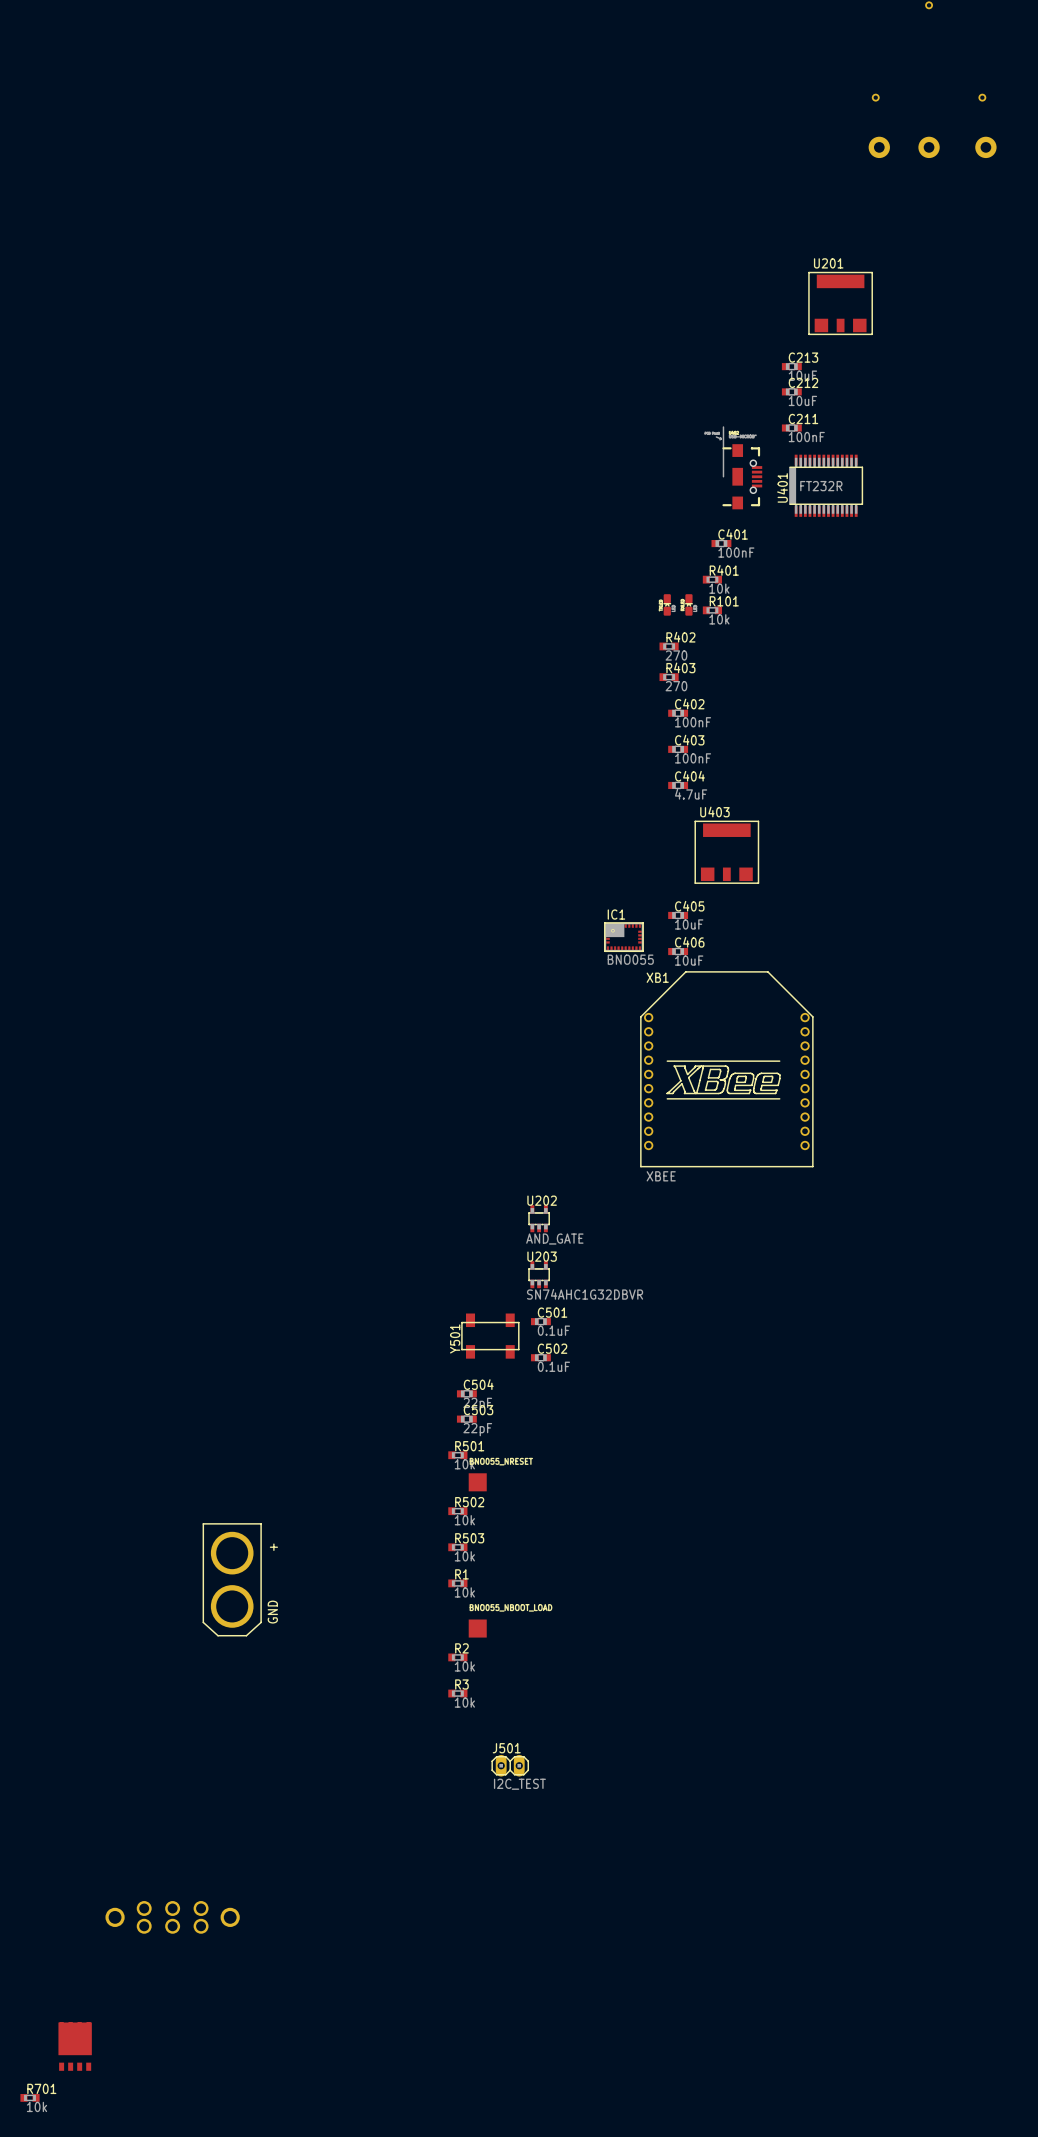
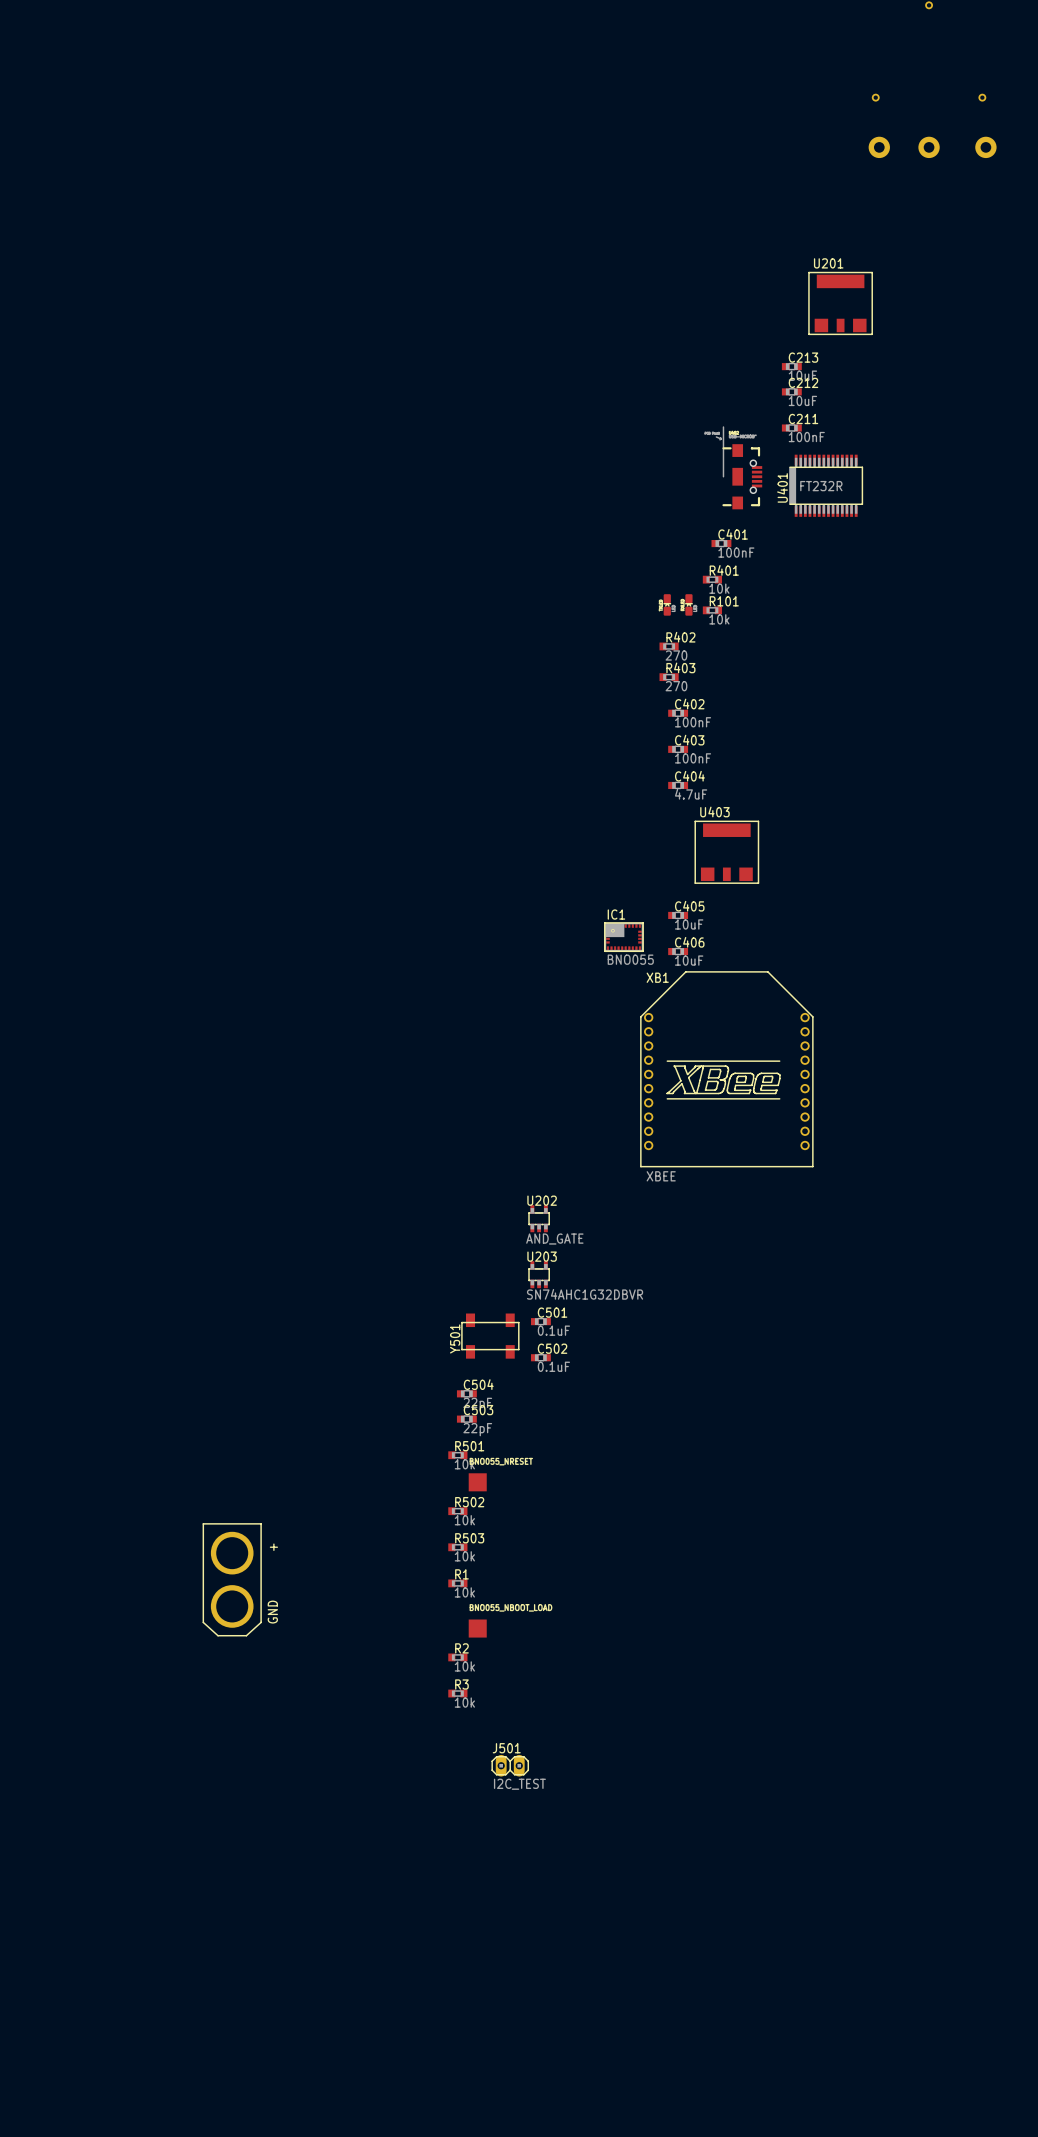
part: (172, 1917) -> none
part: (75, 2046) -> none
R701: 10k (30, 2097) -> none

